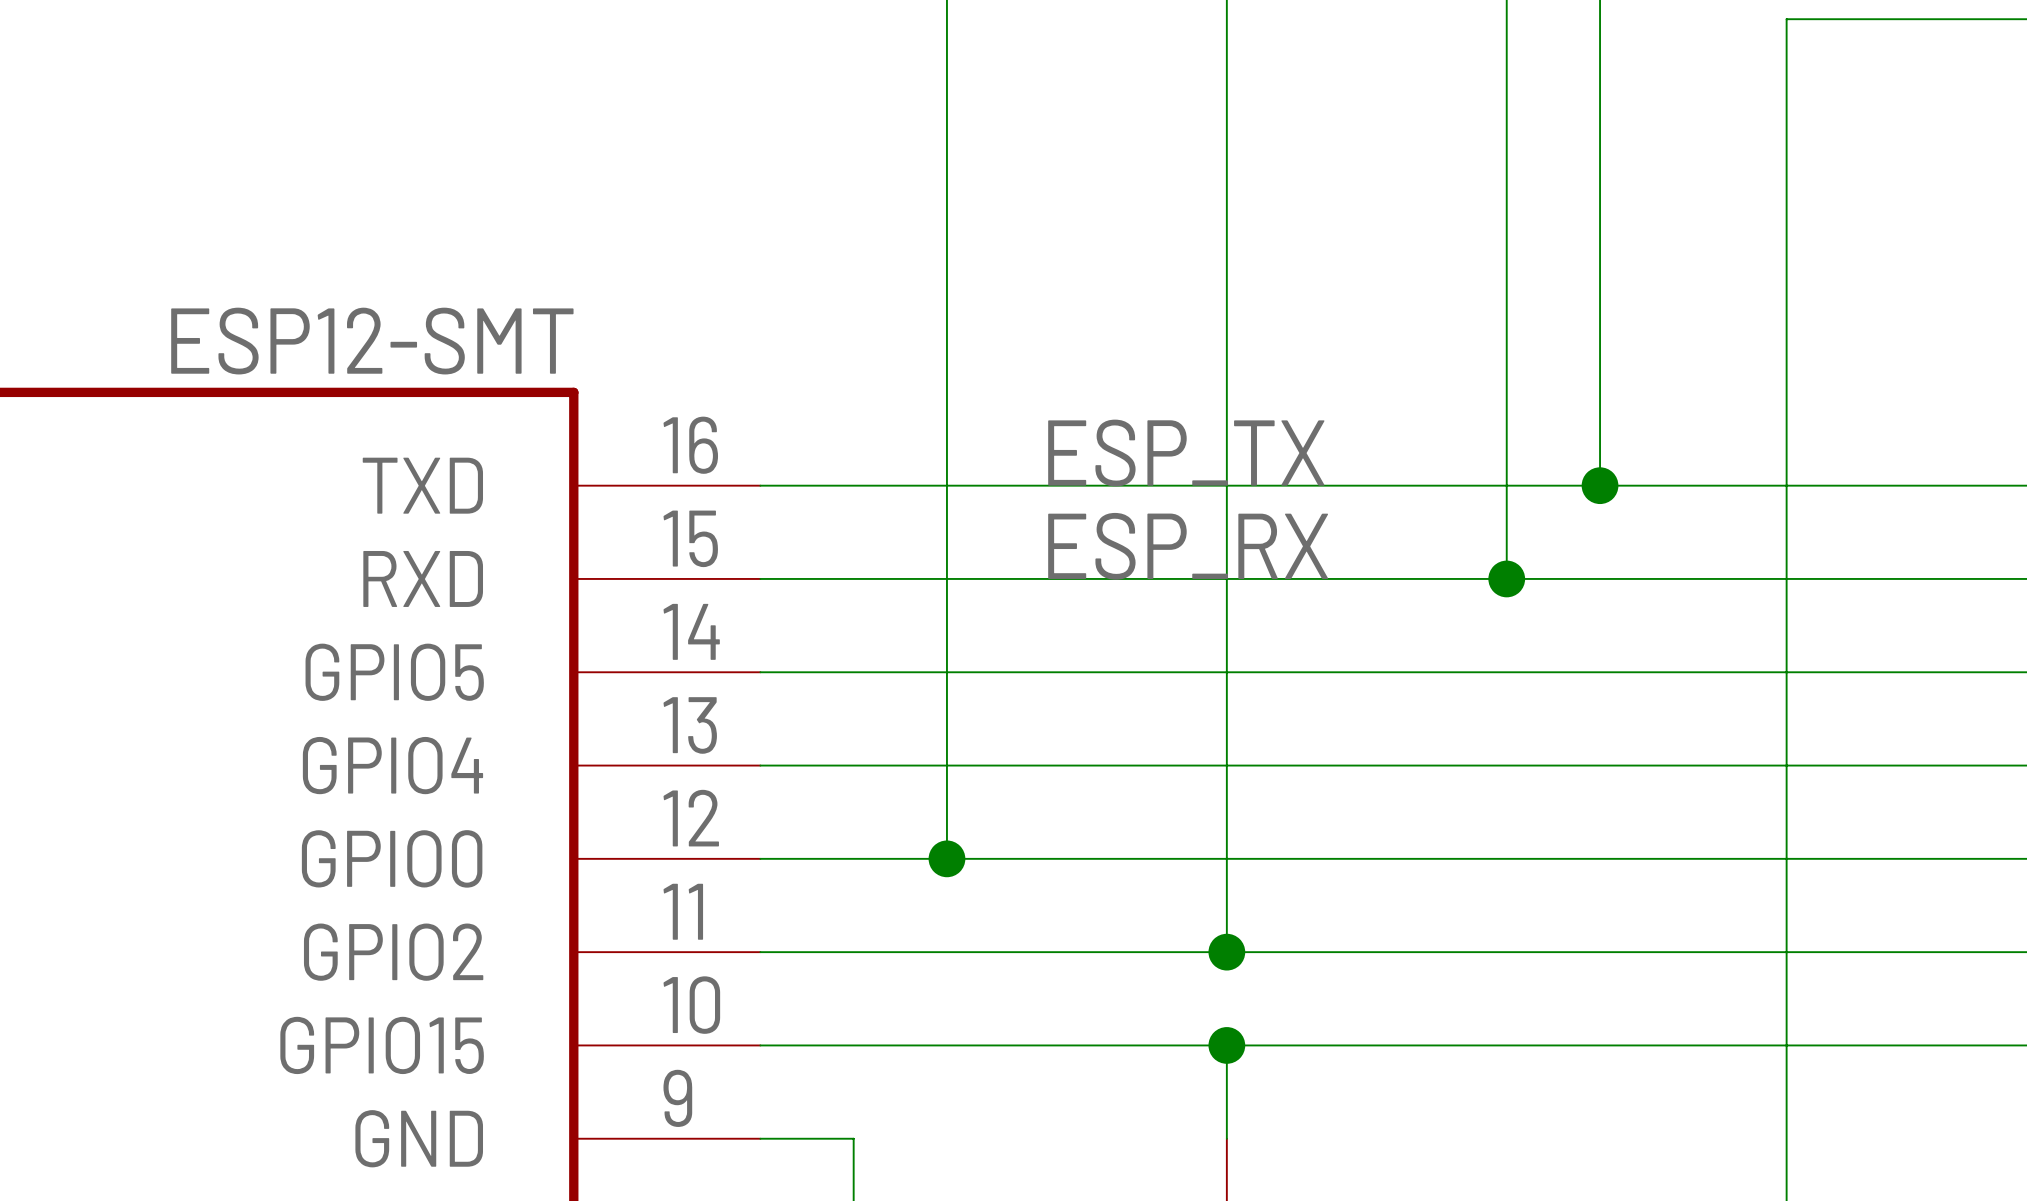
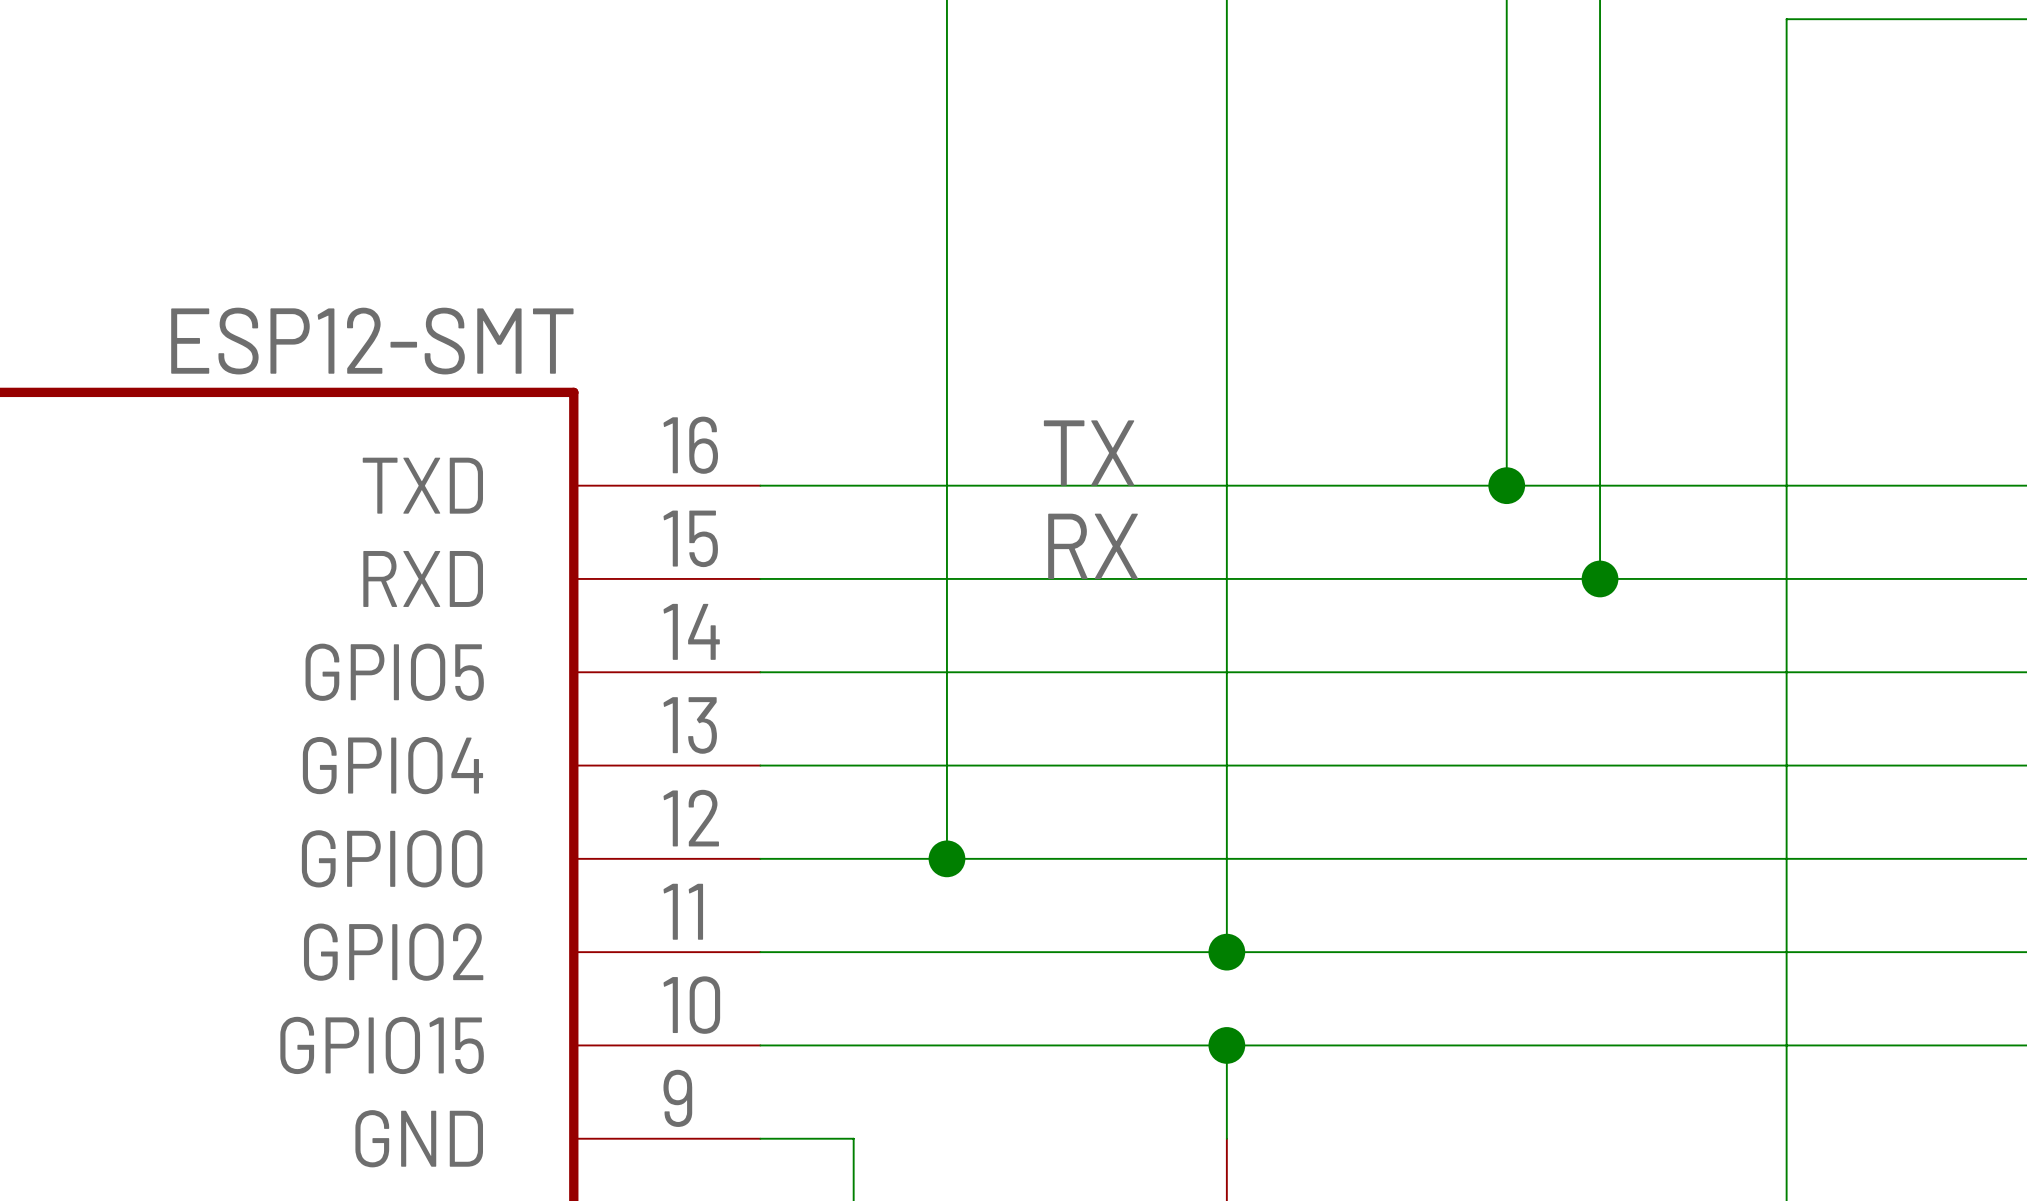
label: ESP_TX (1186, 453) -> TX (1089, 453)
wire: (1506, 485) (1506, 578) -> (1600, 485) (1600, 578)
junction: none -> (1506, 485)
junction: (1600, 485) -> none
label: ESP_RX (1188, 546) -> RX (1093, 546)
junction: (1506, 578) -> none
junction: none -> (1600, 578)

